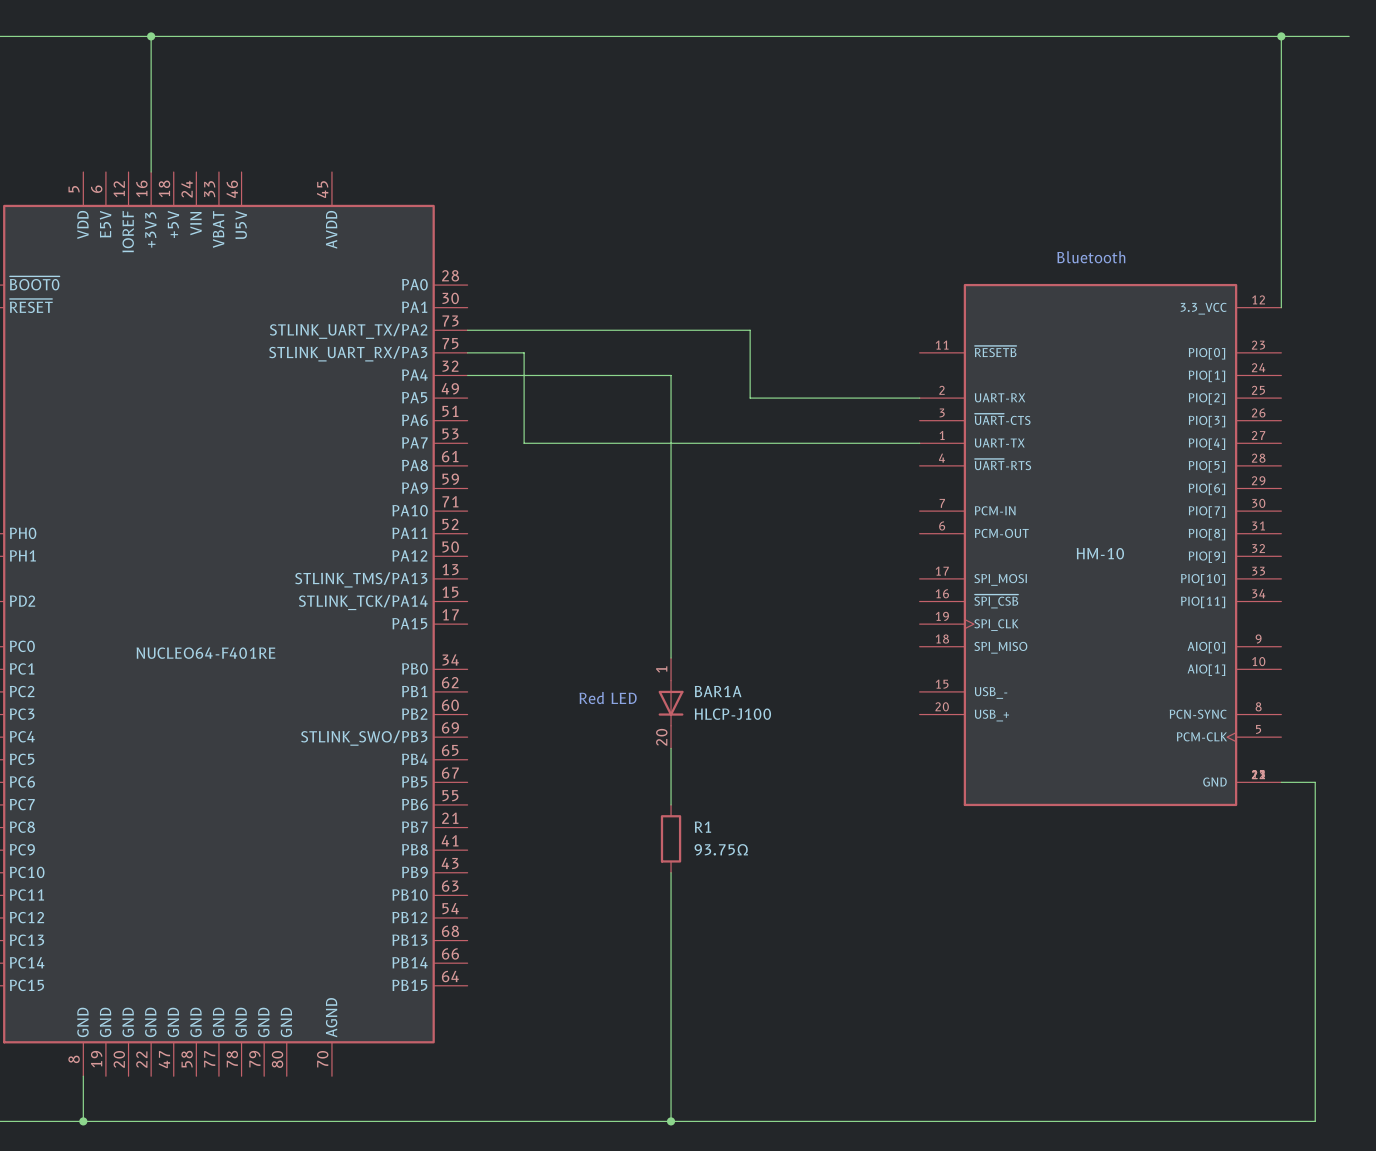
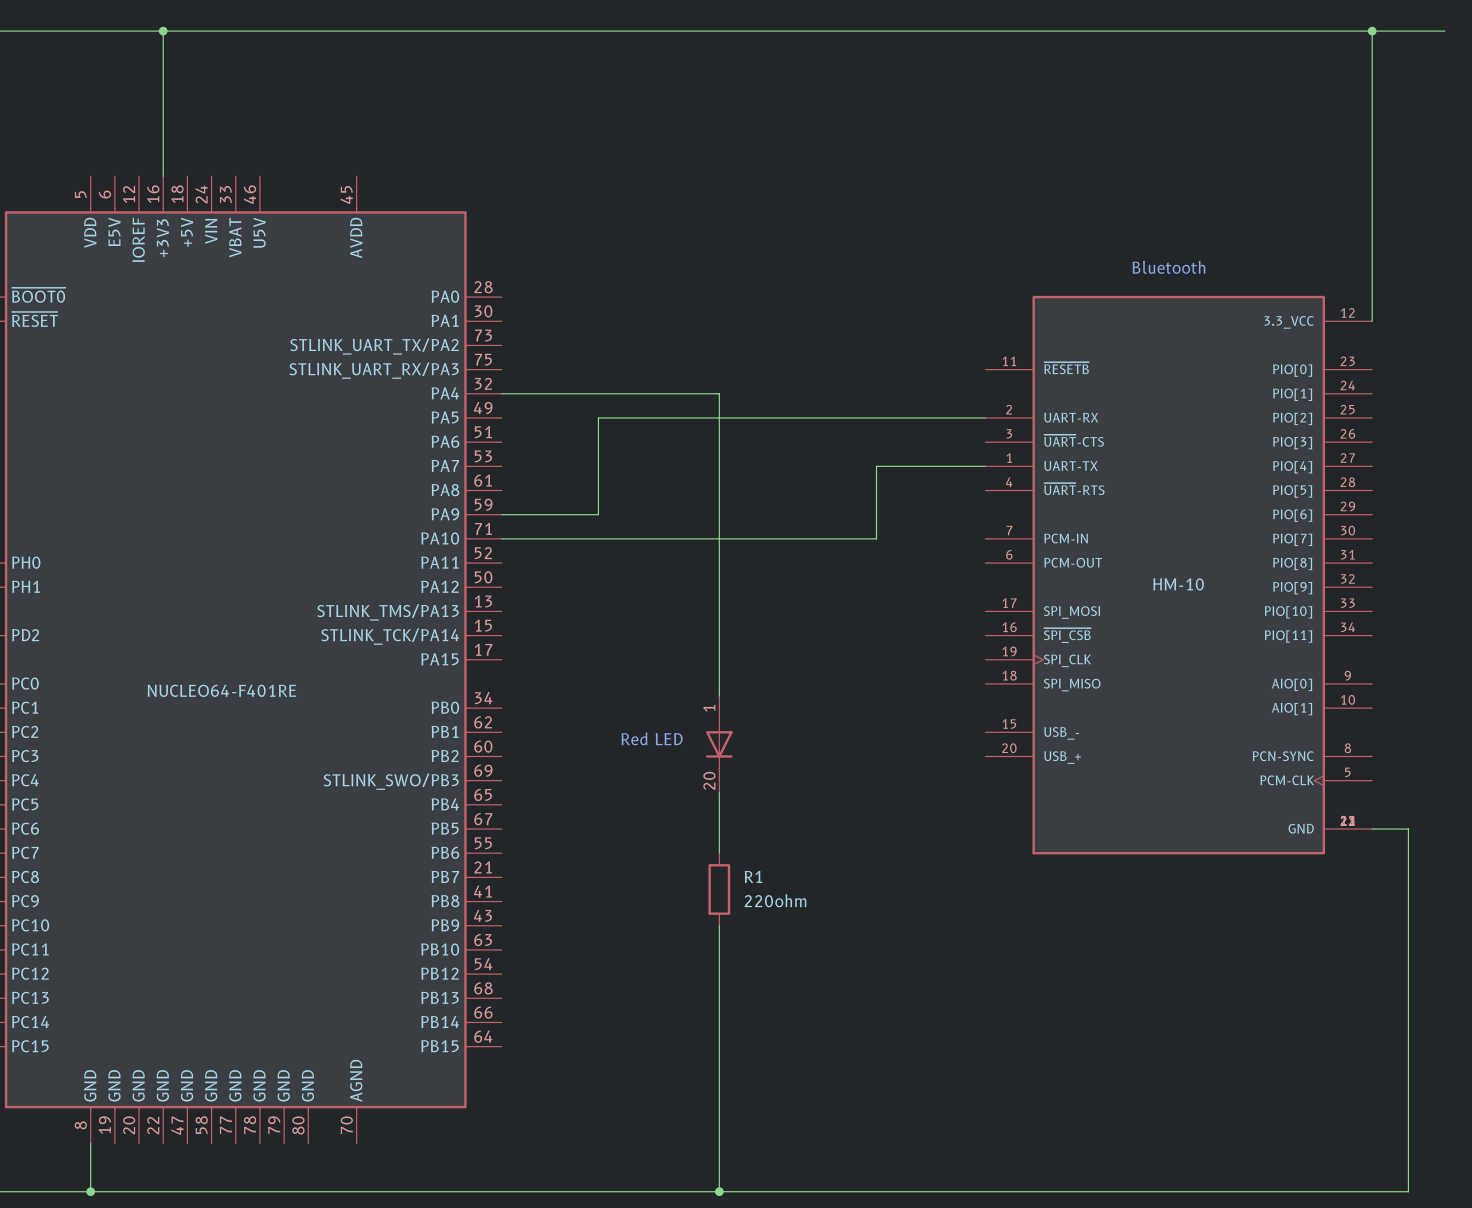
wire: (467, 330) (750, 330) (750, 398) -> (501, 514) (598, 514) (598, 417) (803, 417)
wire: (467, 352) (524, 352) (524, 443) (817, 443) -> (501, 538) (876, 538) (876, 466)
BAR1A name: BAR1A (718, 691) -> none
BAR1A value: HLCP-J100 (732, 714) -> none
R1 value: 93.75Ω (721, 849) -> 220ohm (775, 900)

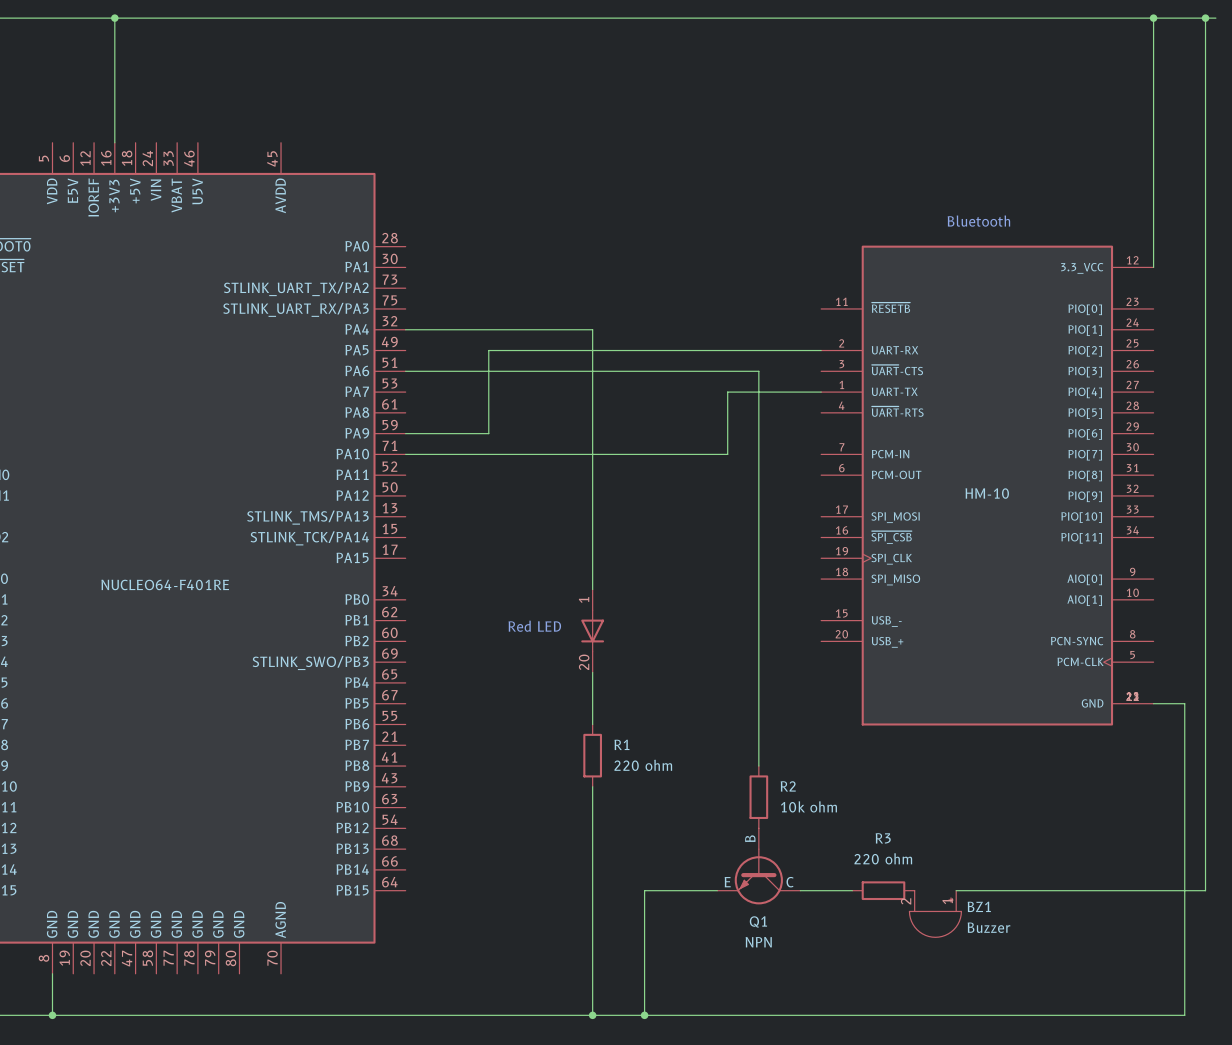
wire: none -> (1205, 18) (1205, 890) (956, 890)
junction: none -> (1205, 18)
wire: none -> (405, 371) (758, 371) (758, 766)
R1 value: 220ohm (775, 900) -> 220 ohm (643, 765)
R2: none -> 10k ohm (758, 797)
Q1: none -> NPN (758, 866)
wire: none -> (717, 890) (644, 890) (644, 1015)
wire: none -> (800, 890) (852, 890)
R3: none -> 220 ohm (883, 890)
BZ1: none -> Buzzer (935, 914)
junction: none -> (644, 1015)

